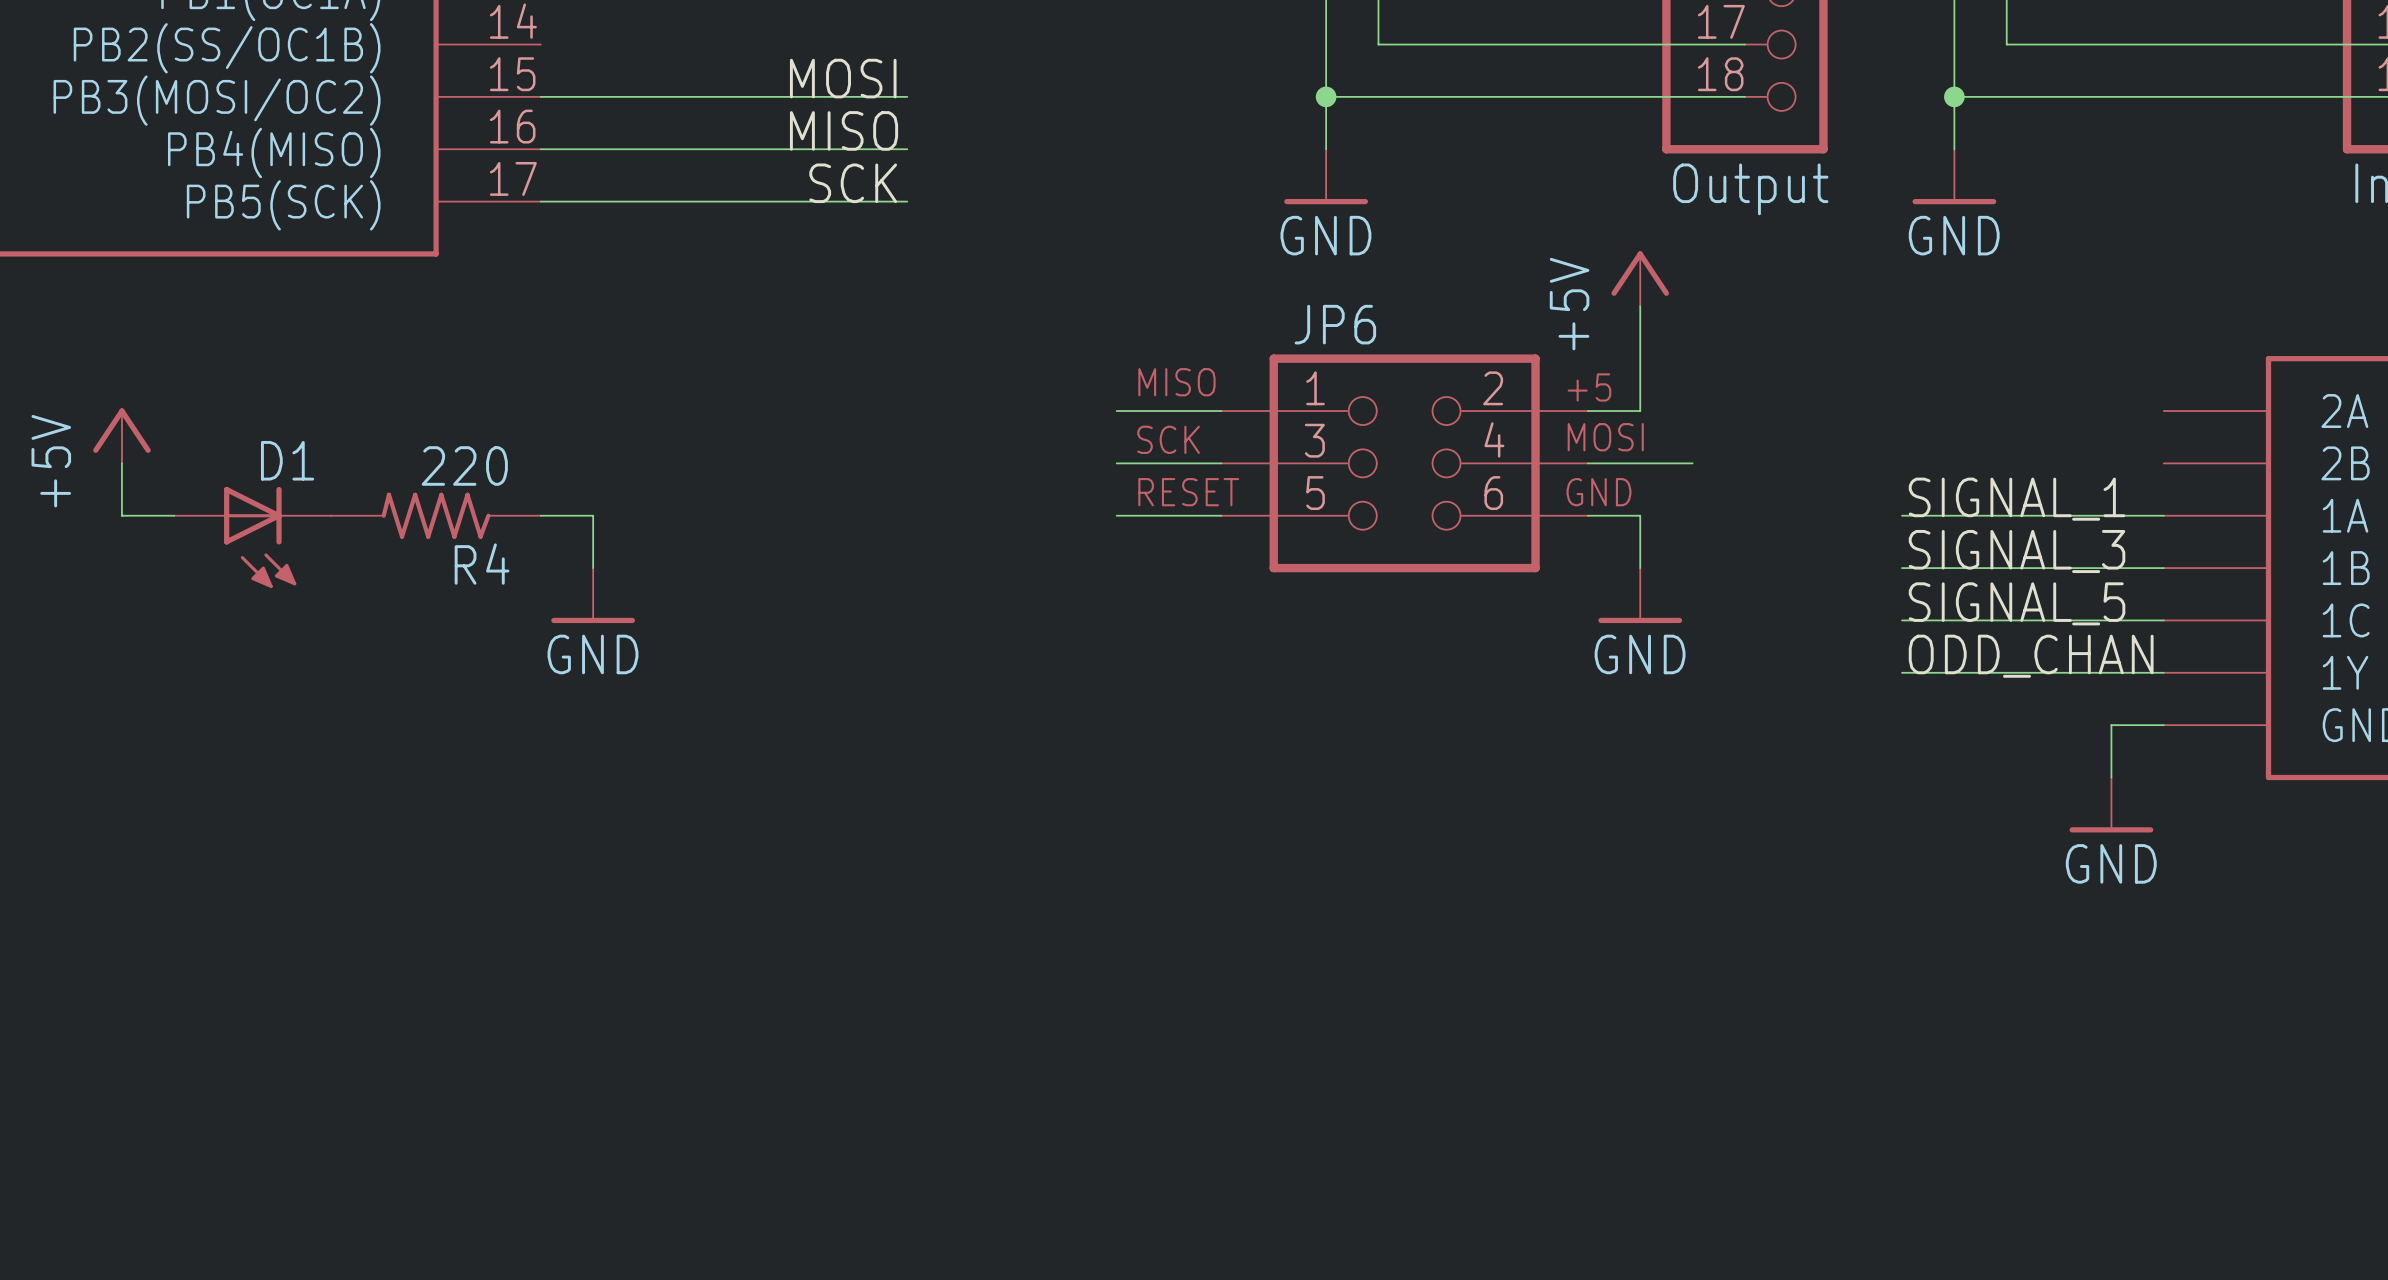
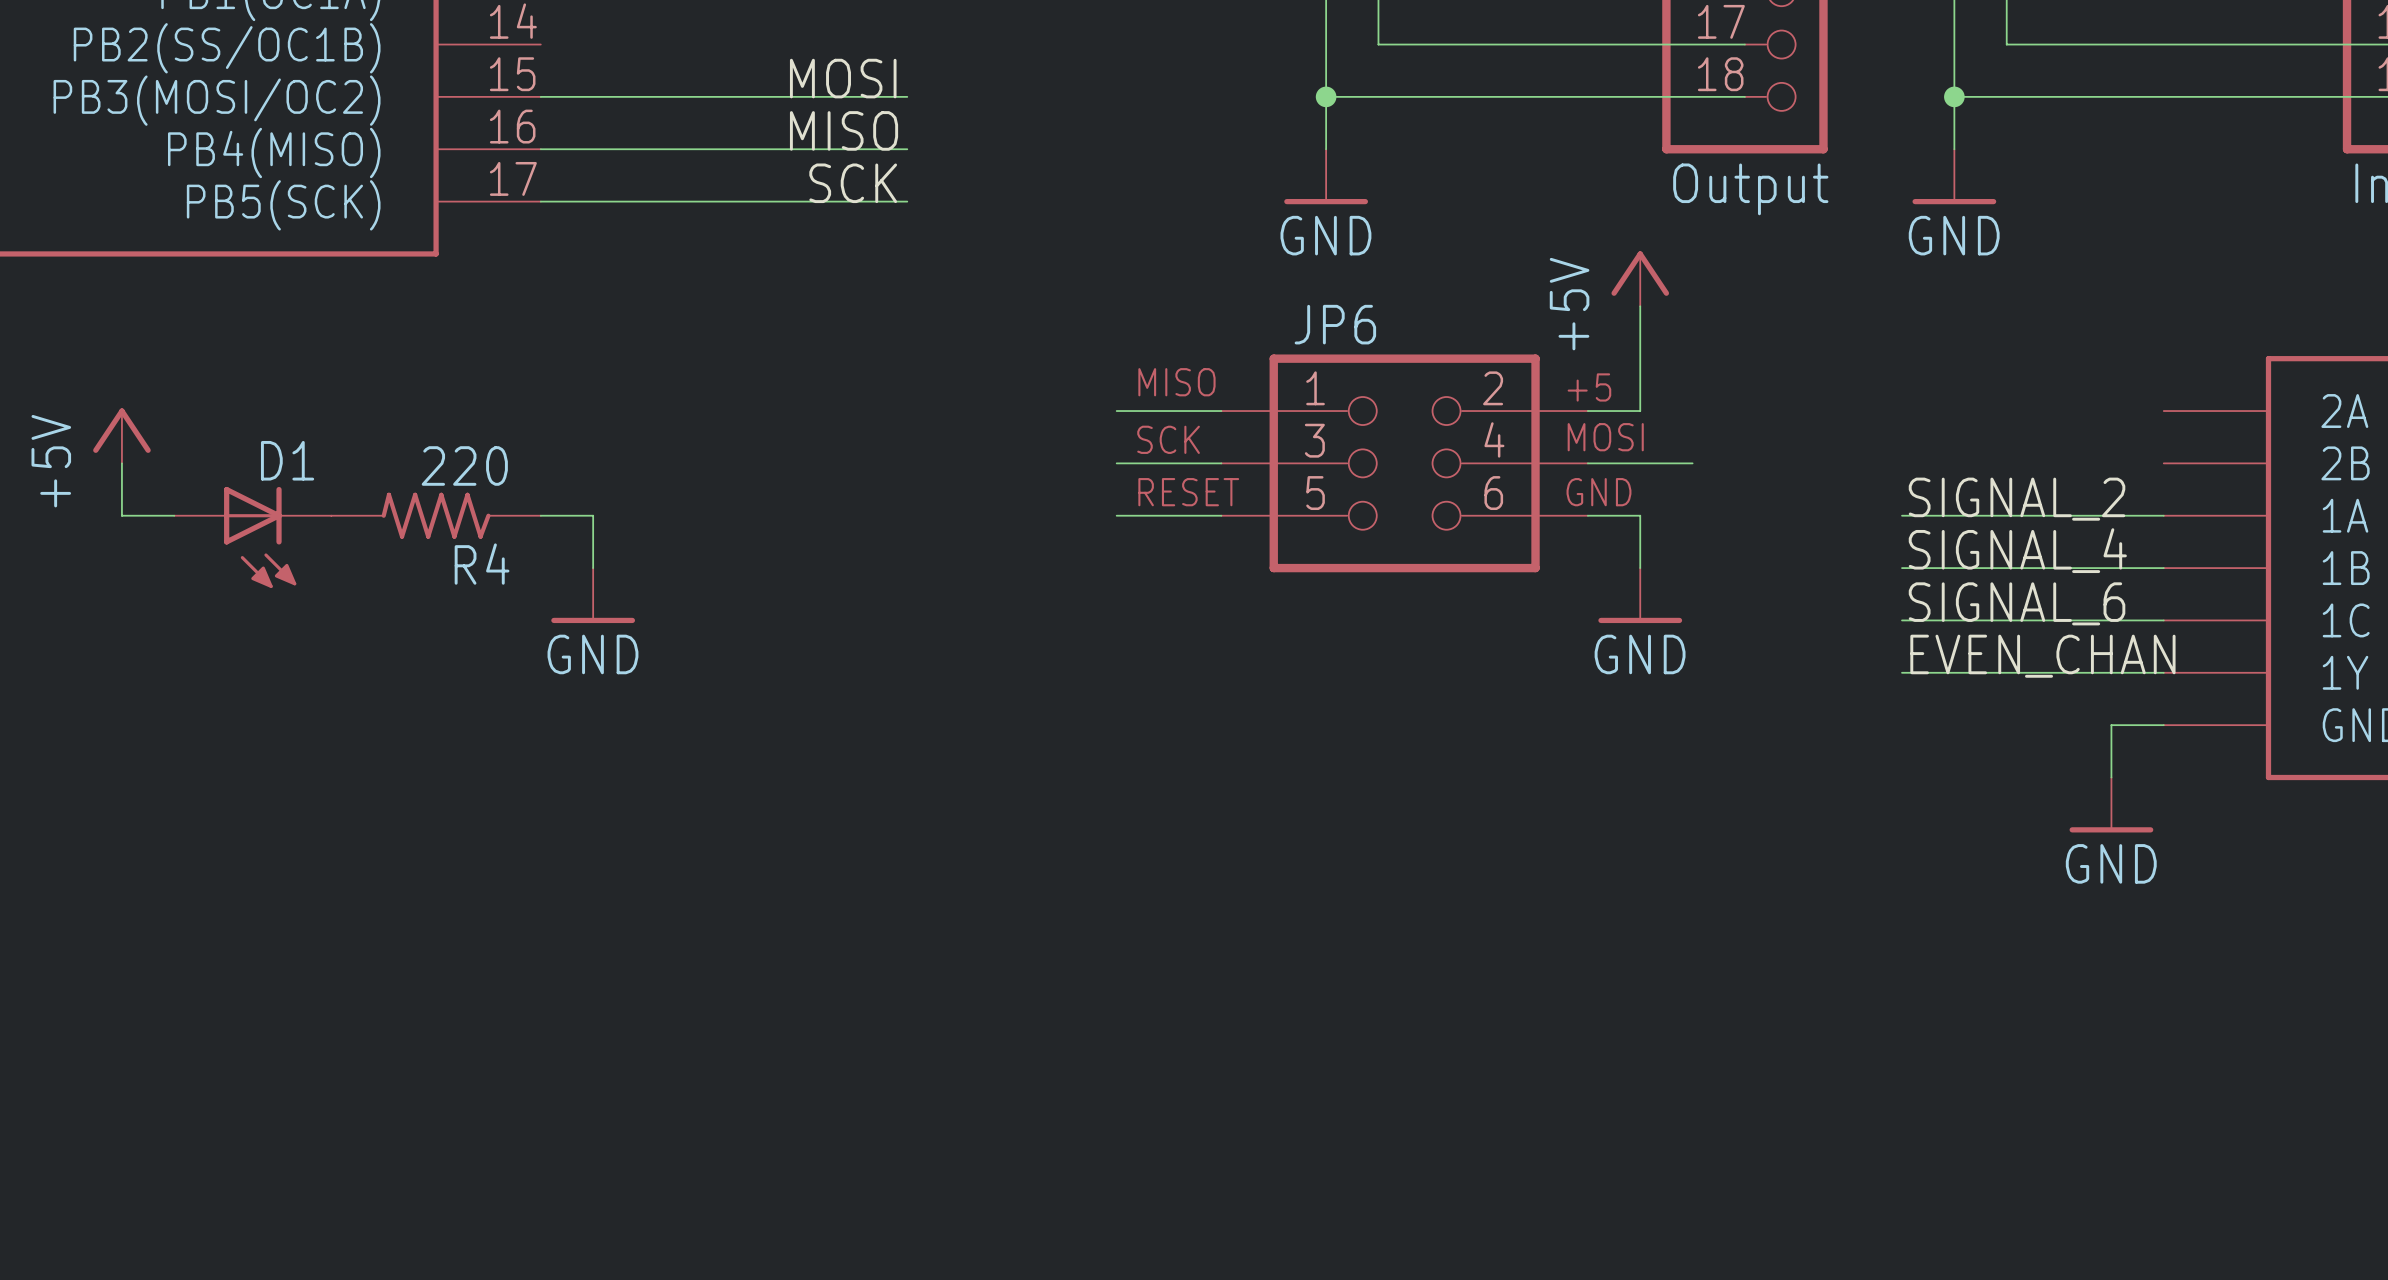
label: SIGNAL_1 (2017, 499) -> SIGNAL_2 (2017, 499)
label: SIGNAL_3 (2017, 551) -> SIGNAL_4 (2017, 550)
label: SIGNAL_5 (2017, 603) -> SIGNAL_6 (2017, 603)
label: ODD_CHAN (2031, 656) -> EVEN_CHAN (2042, 656)

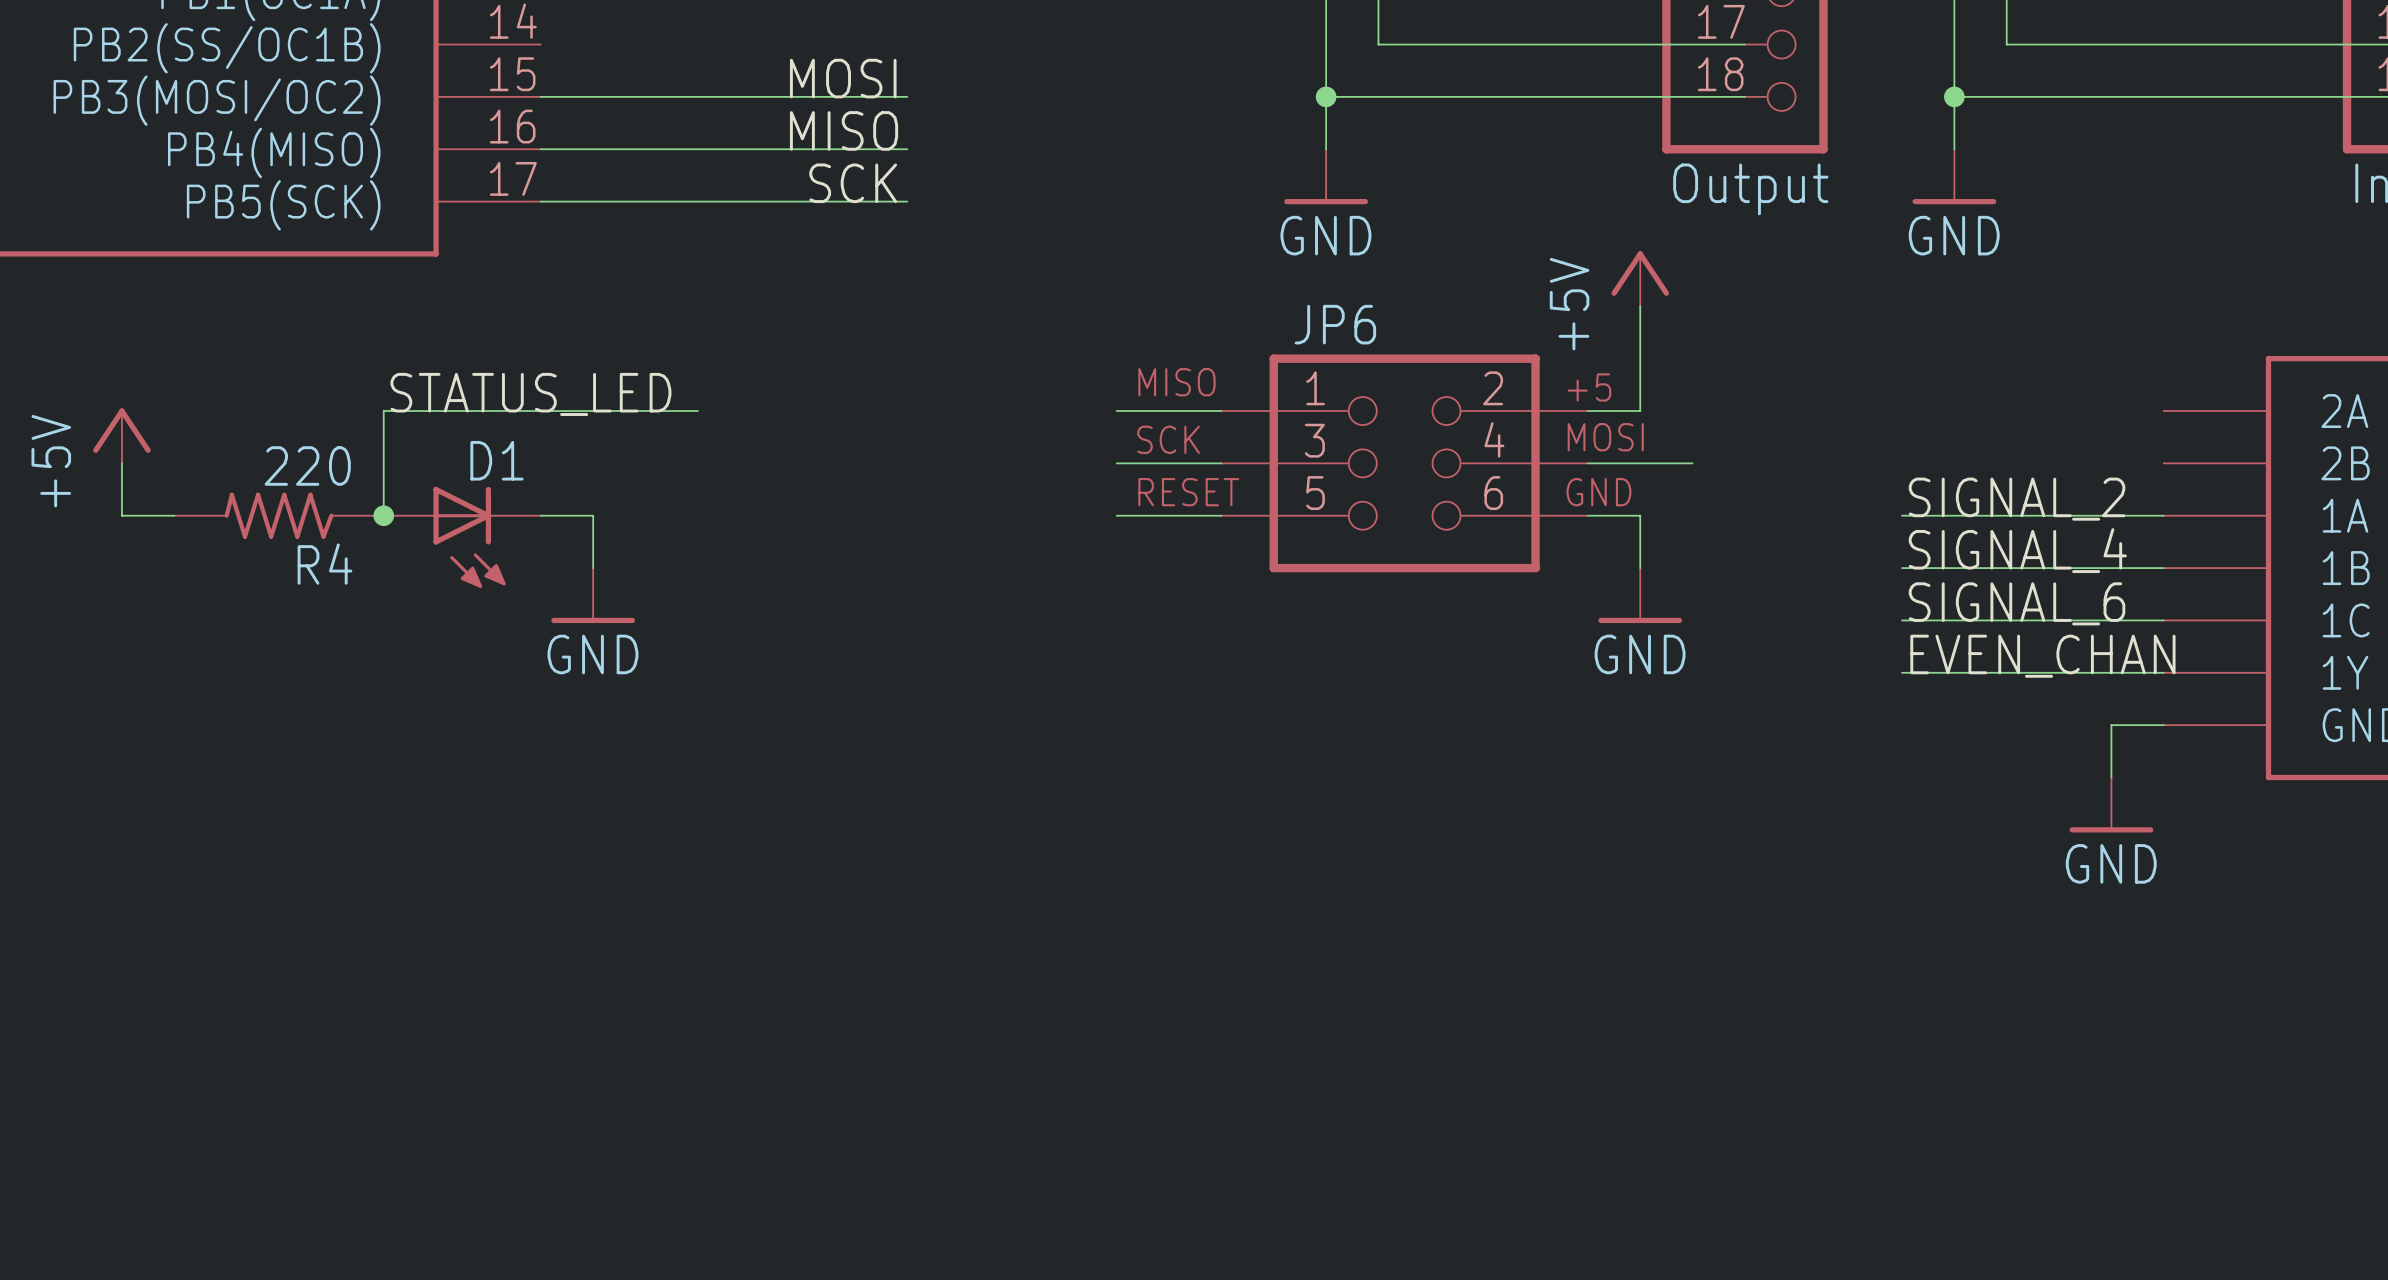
label: none -> STATUS_LED (530, 394)
wire: none -> (697, 411) (383, 411) (383, 515)
junction: none -> (383, 515)
R4 position: (436, 515) -> (279, 515)
D1 position: (252, 537) -> (462, 537)

